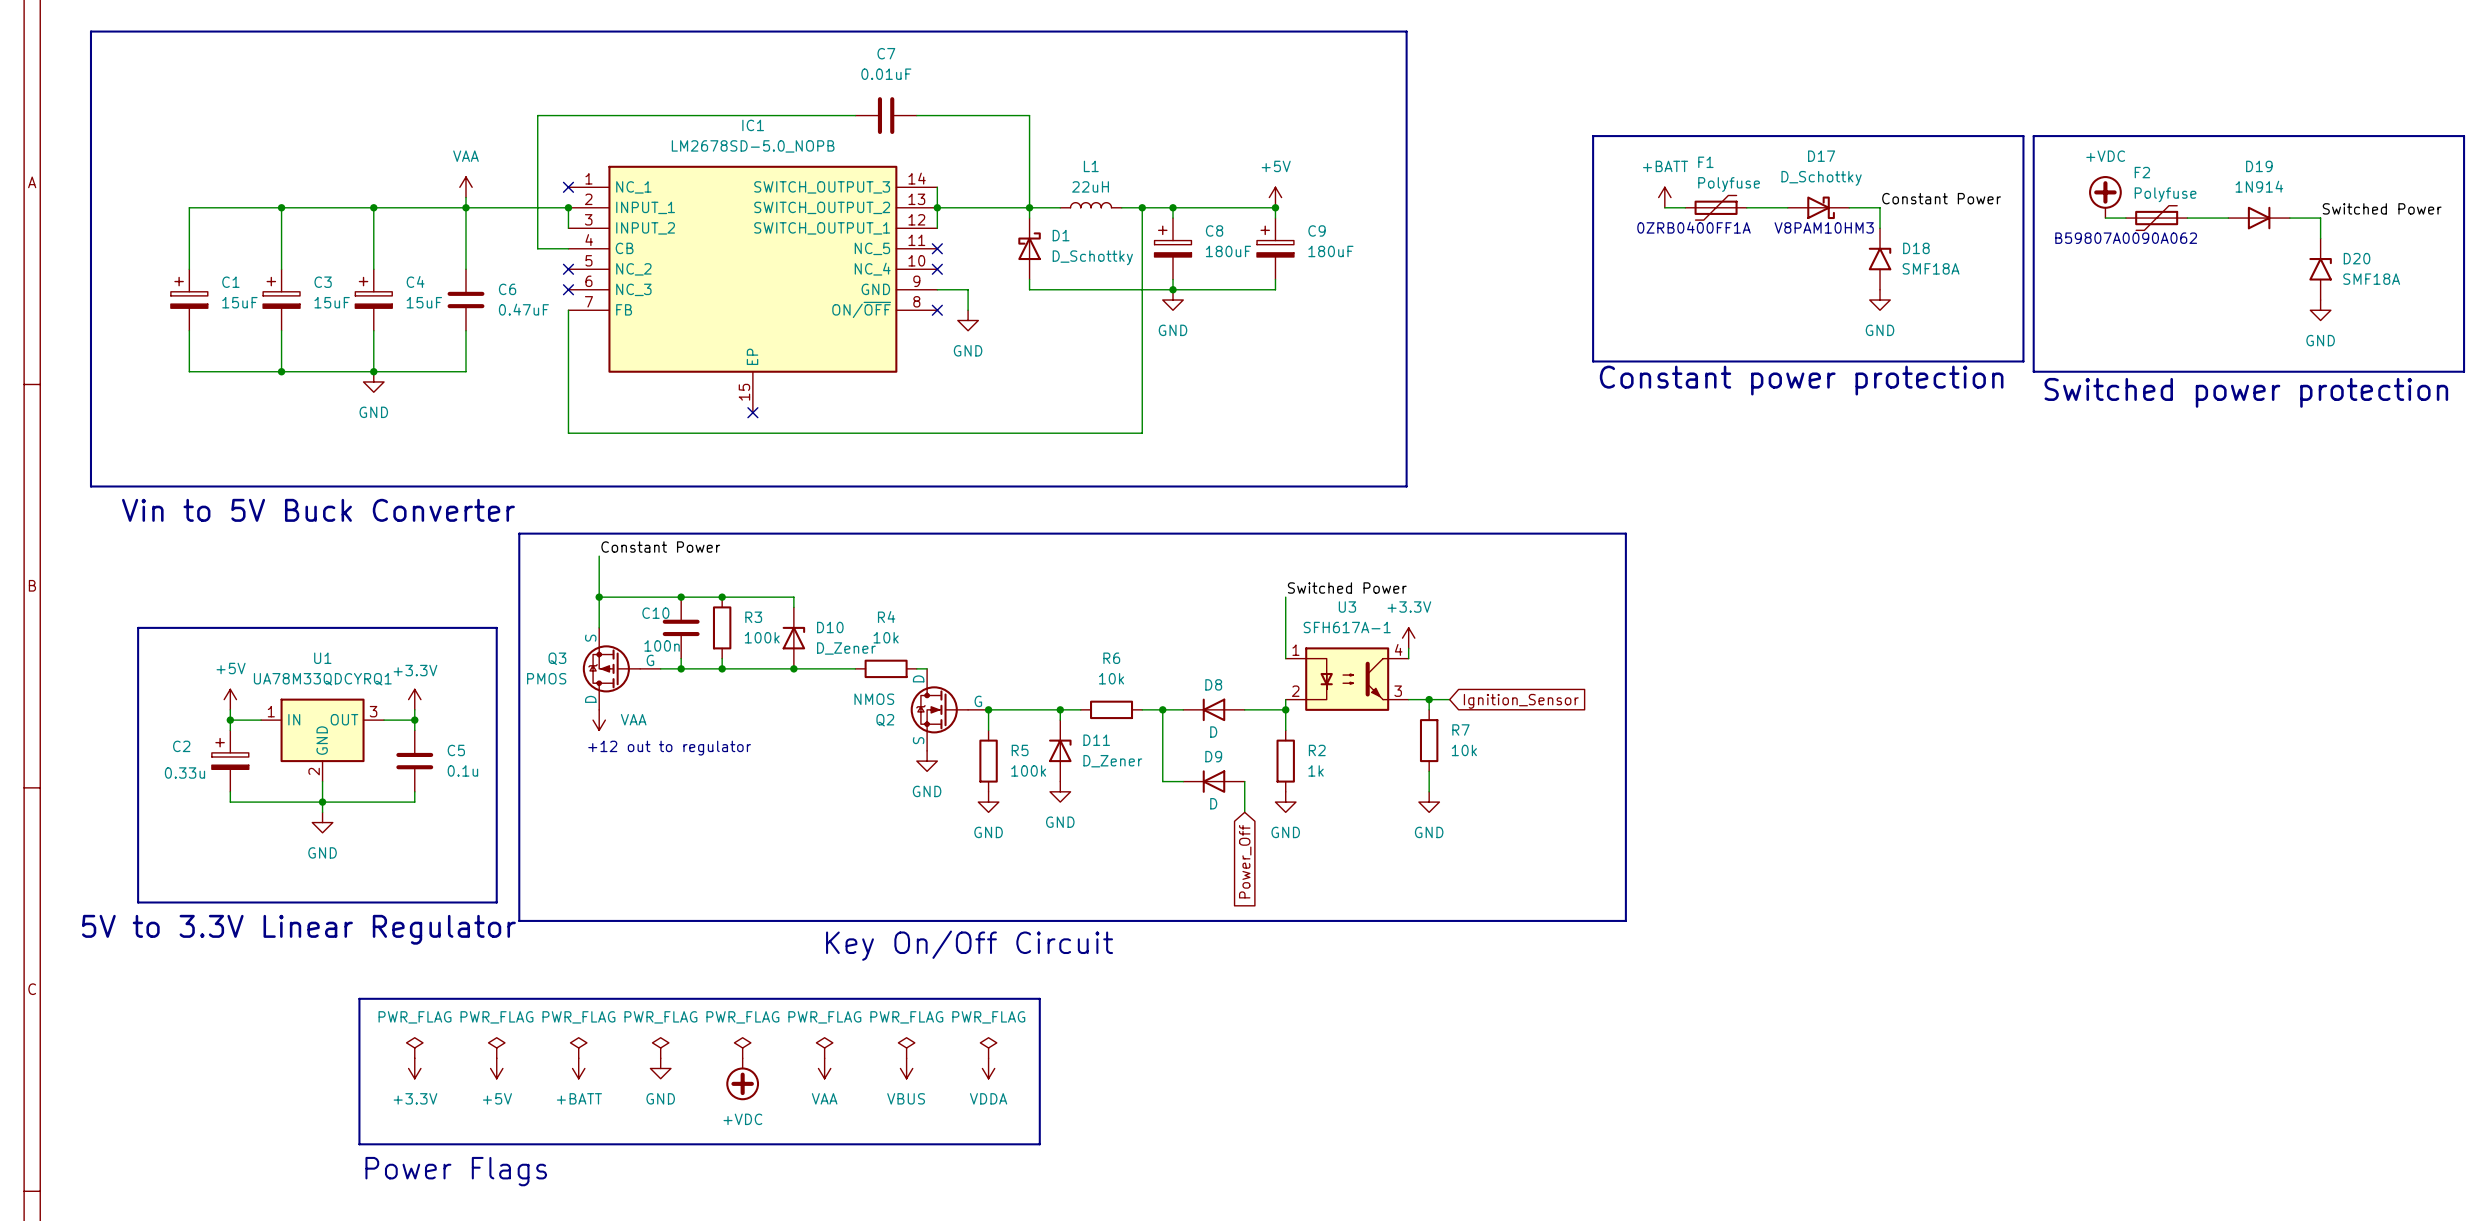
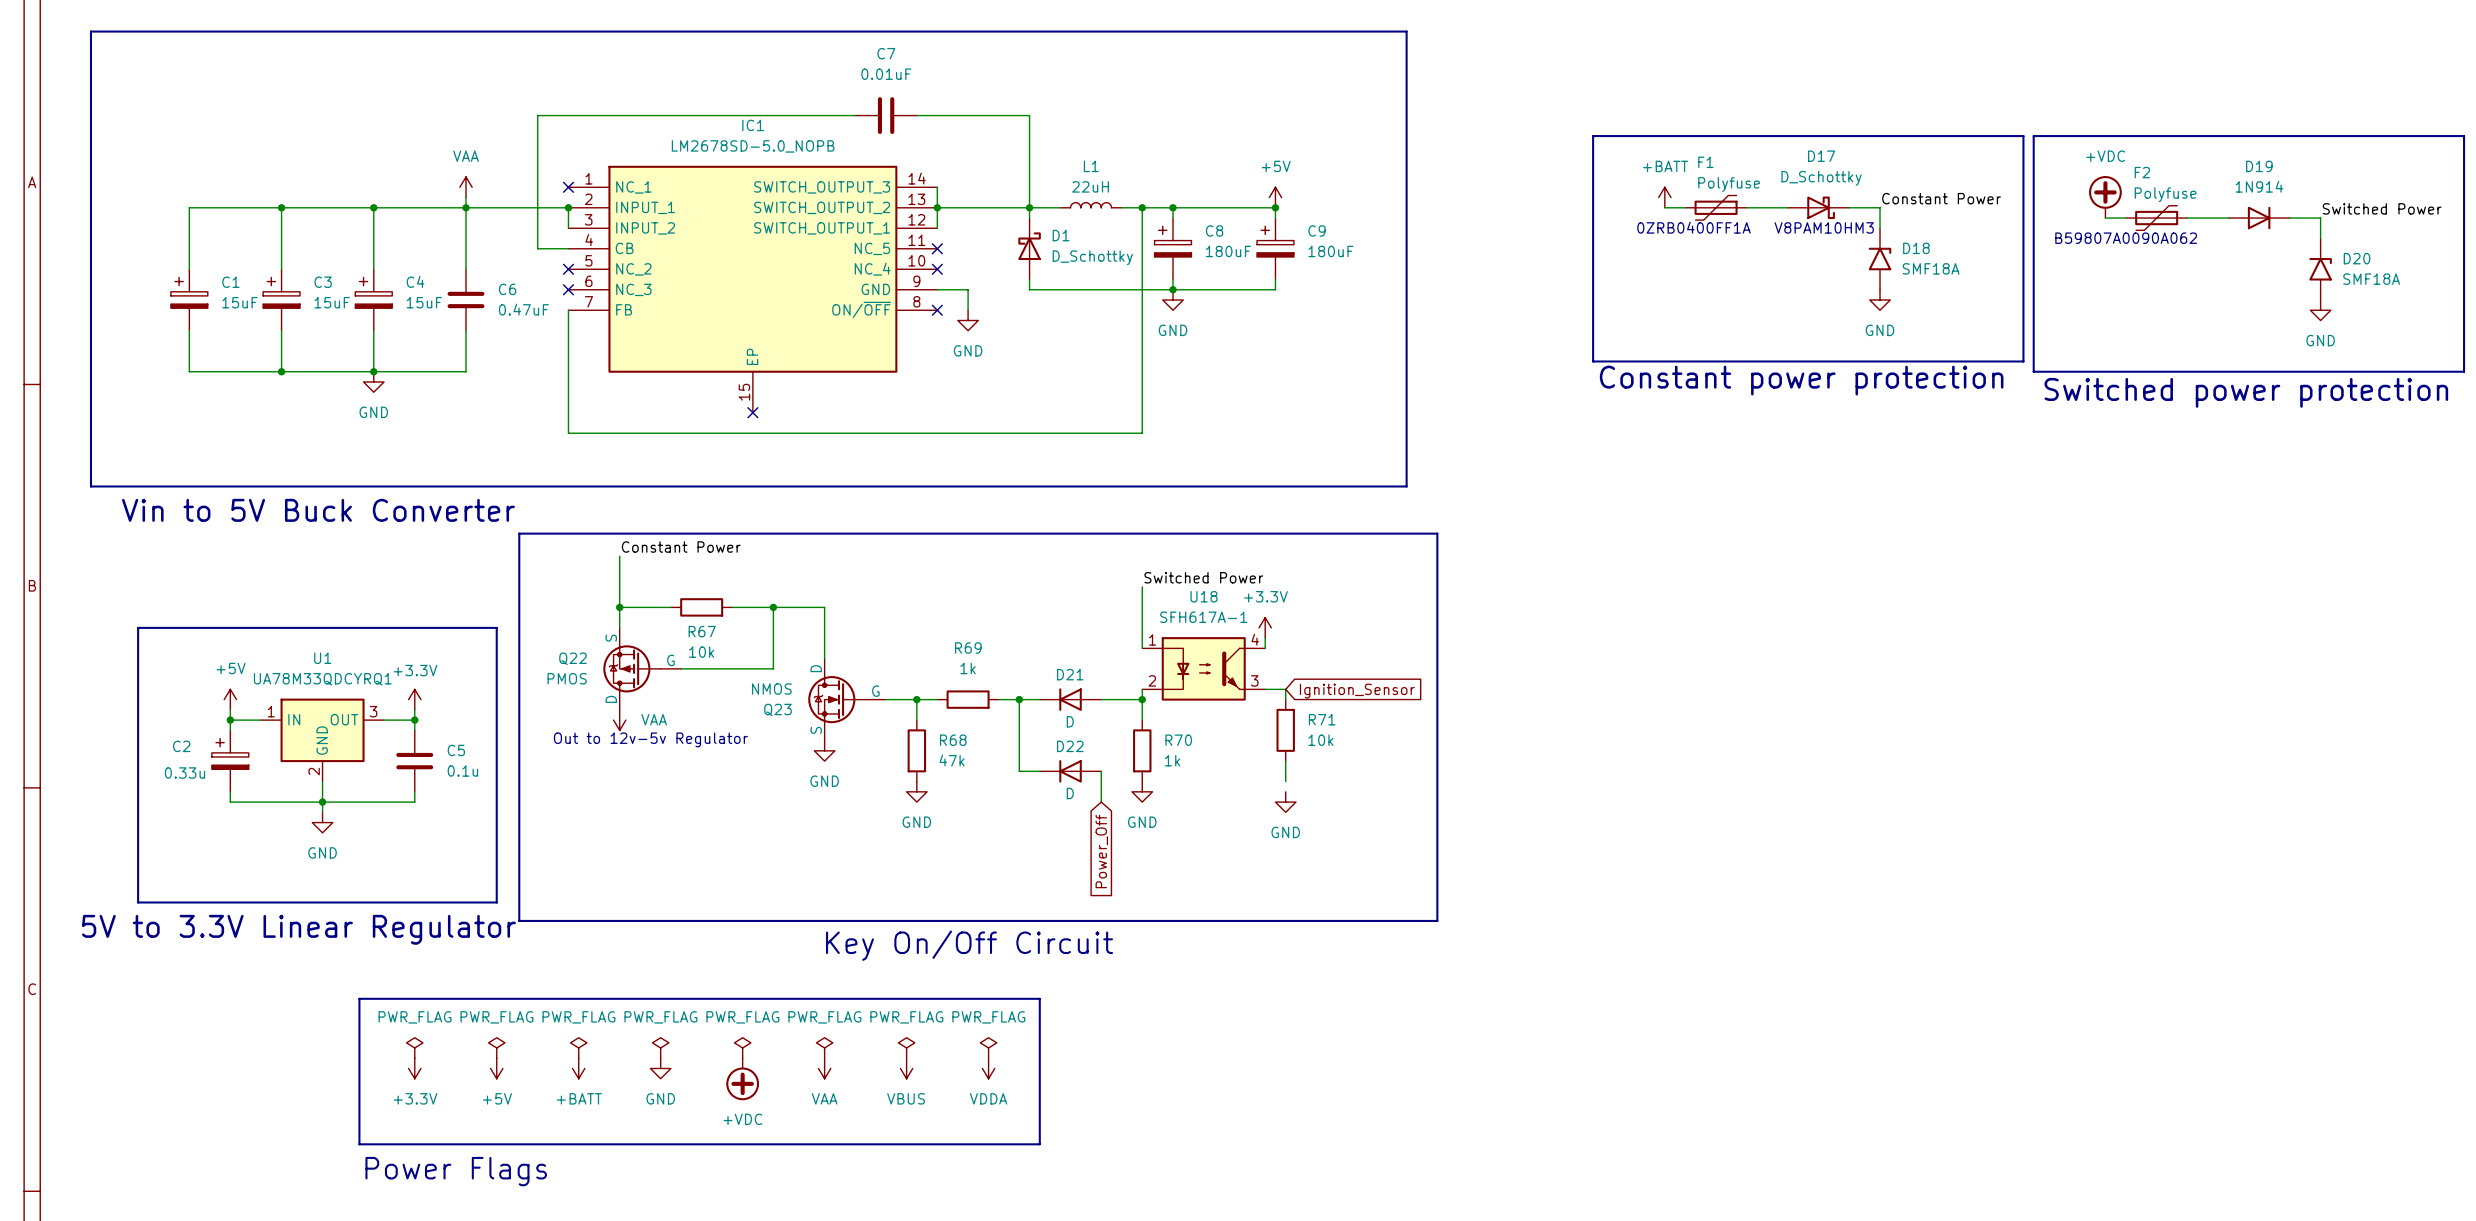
line: (1437, 533) (1625, 533) (1625, 920) (1437, 920) -> (1437, 533) (1437, 920)
label position: Constant Power (660, 547) -> Constant Power (681, 547)
wire: (599, 556) (599, 627) -> (619, 556) (619, 627)
label position: Switched Power (1347, 588) -> Switched Power (1203, 577)
wire: (599, 597) (793, 597) (793, 607) -> none
junction position: (599, 597) -> (619, 607)
junction: (681, 597) -> none
junction: (722, 597) -> none
wire: (1285, 597) (1285, 658) -> (1142, 586) (1142, 648)
wire: none -> (619, 607) (670, 607)
R67: none -> 10k (701, 607)
wire: none -> (732, 607) (824, 607) (824, 658)
junction: none -> (773, 607)
C10: 100n (681, 627) -> none
R3: 100k (722, 627) -> none
D10: D_Zener (793, 638) -> none
power symbol position: +3.3V (1408, 638) -> +3.3V (1265, 627)
wire: (1408, 648) (1408, 658) -> (1265, 638) (1265, 648)
wire: (722, 658) (722, 668) -> none
Q3: PMOS (621, 668) -> none
Q22: none -> PMOS (642, 668)
junction: (681, 668) -> none
junction: (722, 668) -> none
wire: (773, 668) (855, 668) -> (773, 668) (773, 607)
junction: (793, 668) -> none
R4: 10k (886, 668) -> none
wire: (916, 668) (927, 668) -> none
U18: none -> SFH617A-1 (1203, 668)
U3: SFH617A-1 (1347, 679) -> none
wire: none -> (1142, 689) (1142, 720)
Q23: none -> NMOS (847, 699)
wire: none -> (886, 699) (937, 699)
wire: none -> (916, 699) (916, 720)
junction: none -> (916, 699)
R69: none -> 1k (968, 699)
junction: none -> (1019, 699)
D21: none -> D (1070, 699)
wire: (1285, 699) (1285, 730) -> (1285, 699) (1285, 689) (1265, 689)
wire: (1408, 699) (1449, 699) -> none
wire: (1429, 699) (1429, 709) -> none
junction: (1429, 699) -> none
global label position: Ignition_Sensor (1521, 701) -> Ignition_Sensor (1357, 691)
Q2: NMOS (949, 709) -> none
junction: (988, 709) -> none
wire: (1060, 709) (1060, 720) -> none
junction: (1060, 709) -> none
wire: (1080, 709) (988, 709) (988, 730) -> none
R6: 10k (1111, 709) -> none
wire: (1142, 709) (1183, 709) -> (998, 699) (1039, 699)
wire: (1162, 709) (1162, 781) (1183, 781) -> (1019, 699) (1019, 771) (1039, 771)
junction position: (1162, 709) -> (1142, 699)
D8: D (1213, 709) -> none
wire: (1244, 709) (1285, 709) -> (1101, 699) (1142, 699)
junction: (1285, 709) -> none
power symbol position: VAA (599, 720) -> VAA (619, 720)
R71: none -> 10k (1285, 730)
R7: 10k (1429, 740) -> none
text: +12 out to regulator (669, 748) -> Out to 12v-5v Regulator (650, 739)
power symbol: none -> GND (824, 750)
R68: none -> 47k (916, 750)
D11: D_Zener (1060, 750) -> none
R70: none -> 1k (1142, 750)
power symbol position: GND (927, 761) -> GND (916, 791)
R5: 100k (988, 761) -> none
R2: 1k (1285, 761) -> none
D22: none -> D (1070, 771)
wire: (1429, 771) (1429, 791) -> (1285, 761) (1285, 781)
D9: D (1213, 781) -> none
wire: (1244, 781) (1244, 812) -> (1101, 771) (1101, 802)
power symbol: GND (1060, 791) -> none
power symbol: none -> GND (1142, 791)
power symbol: GND (988, 802) -> none
power symbol: GND (1429, 802) -> none
global label position: Power_Off (1245, 861) -> Power_Off (1101, 851)

